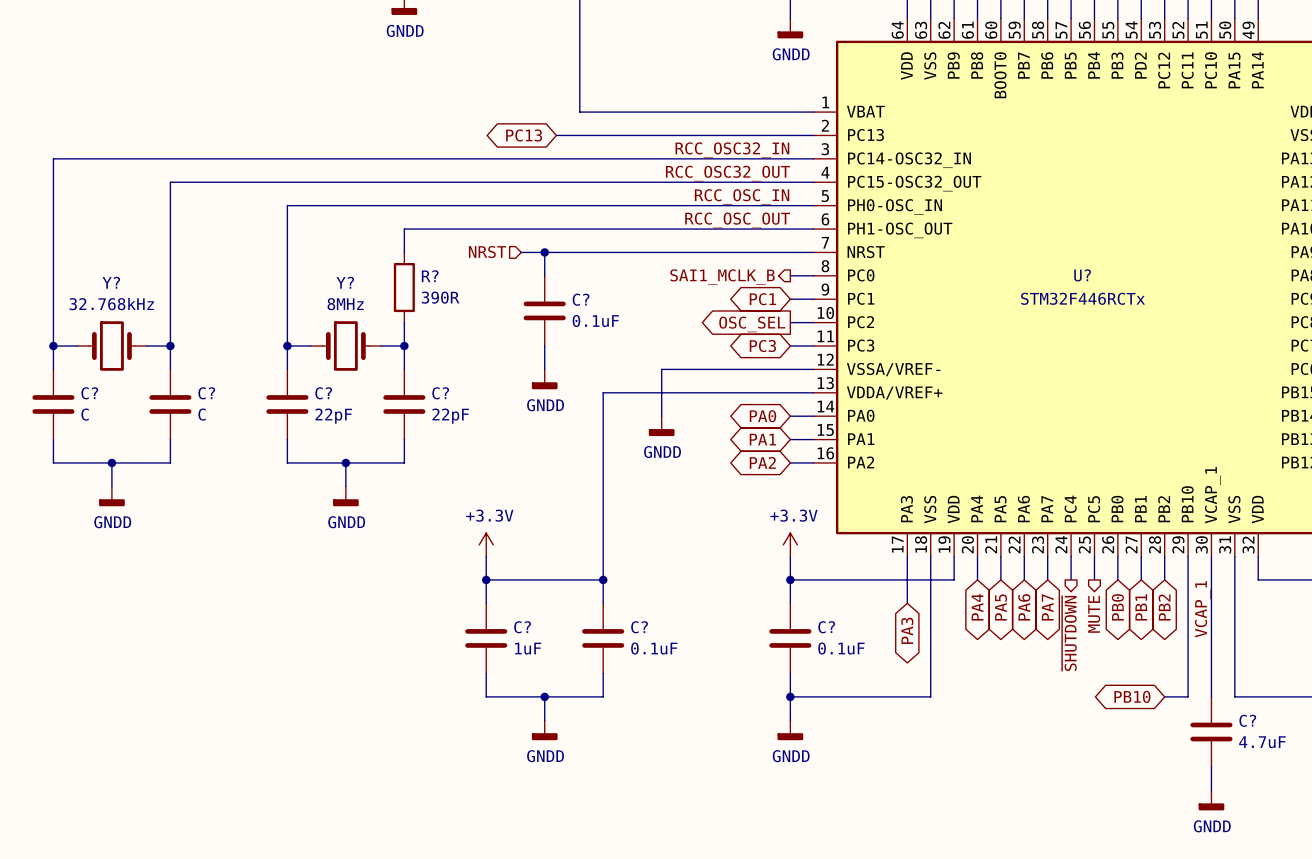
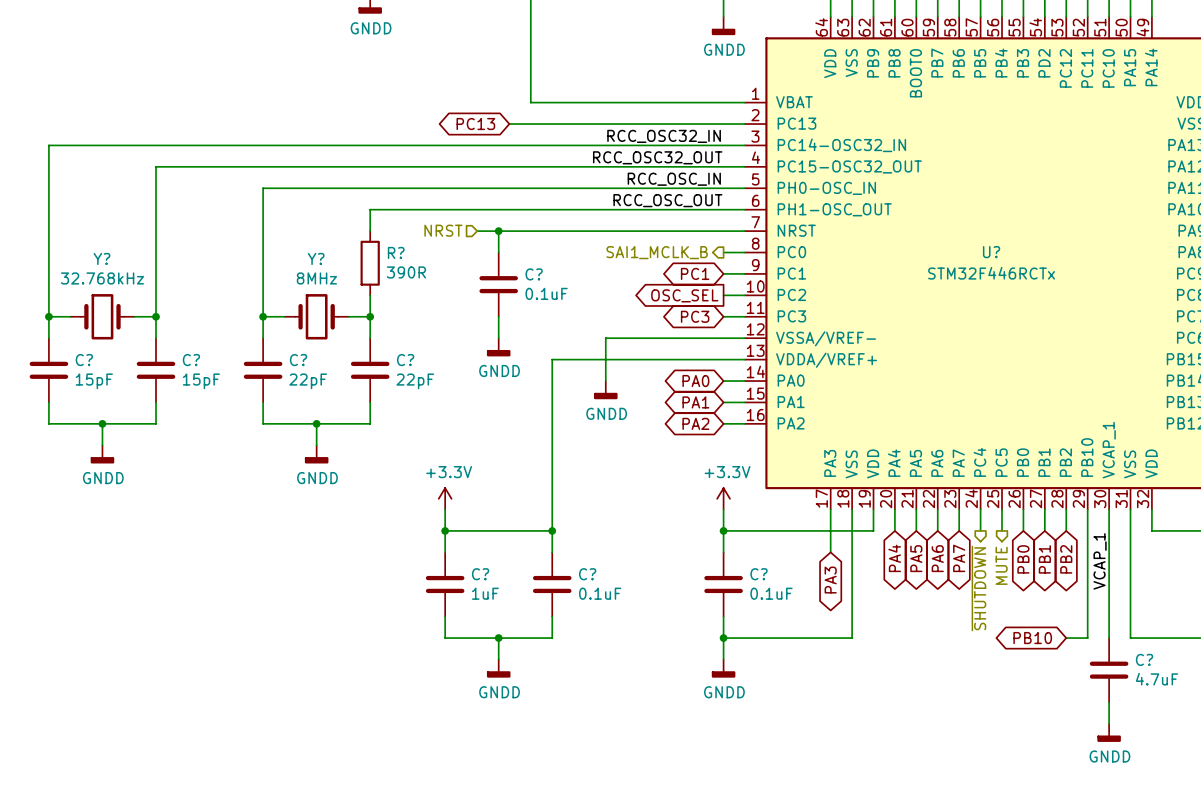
C? value: C (85, 414) -> 15pF (94, 381)
C? value: C (202, 414) -> 15pF (201, 381)

